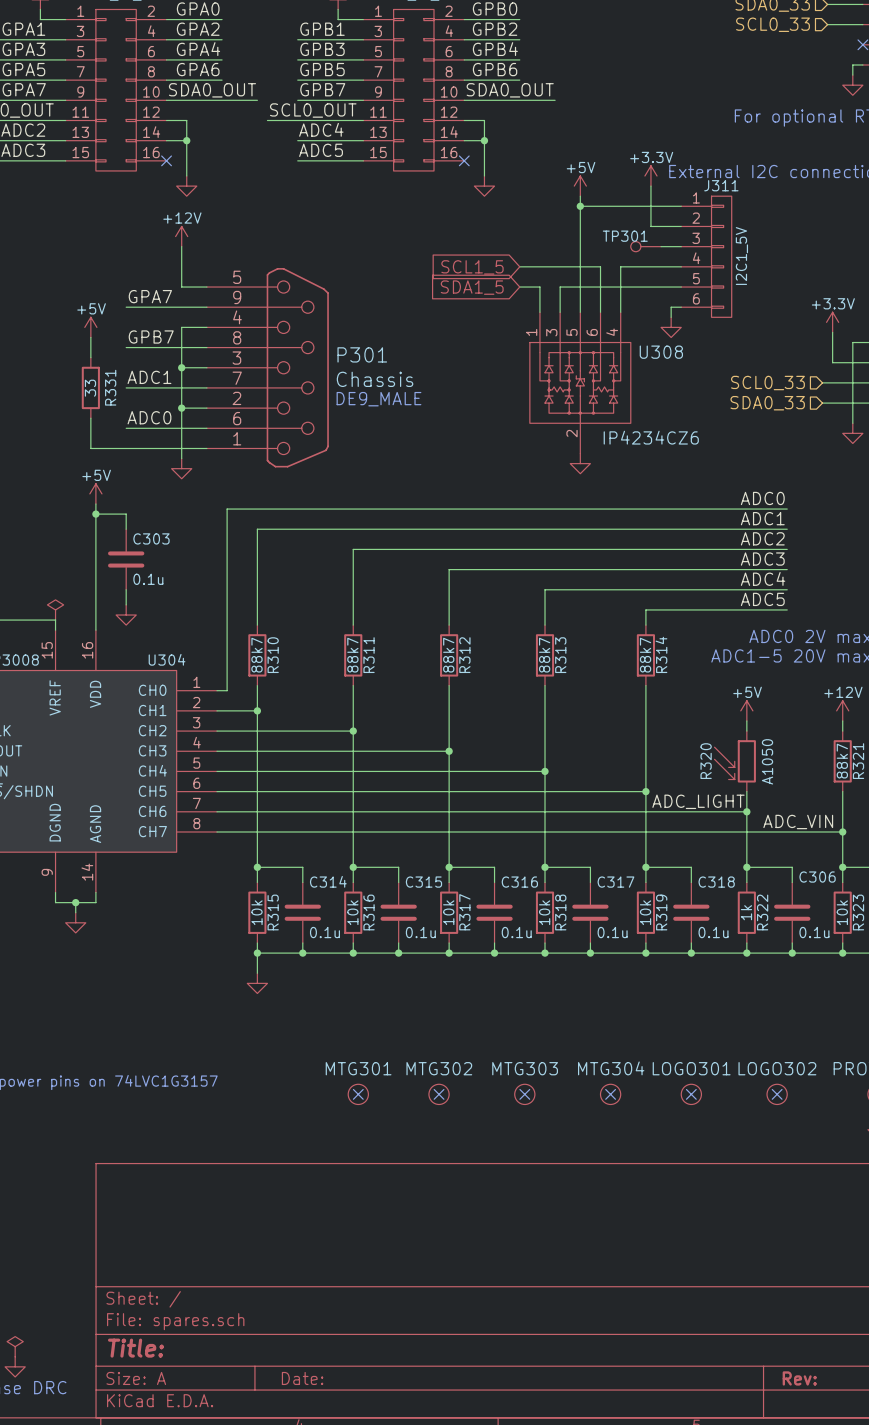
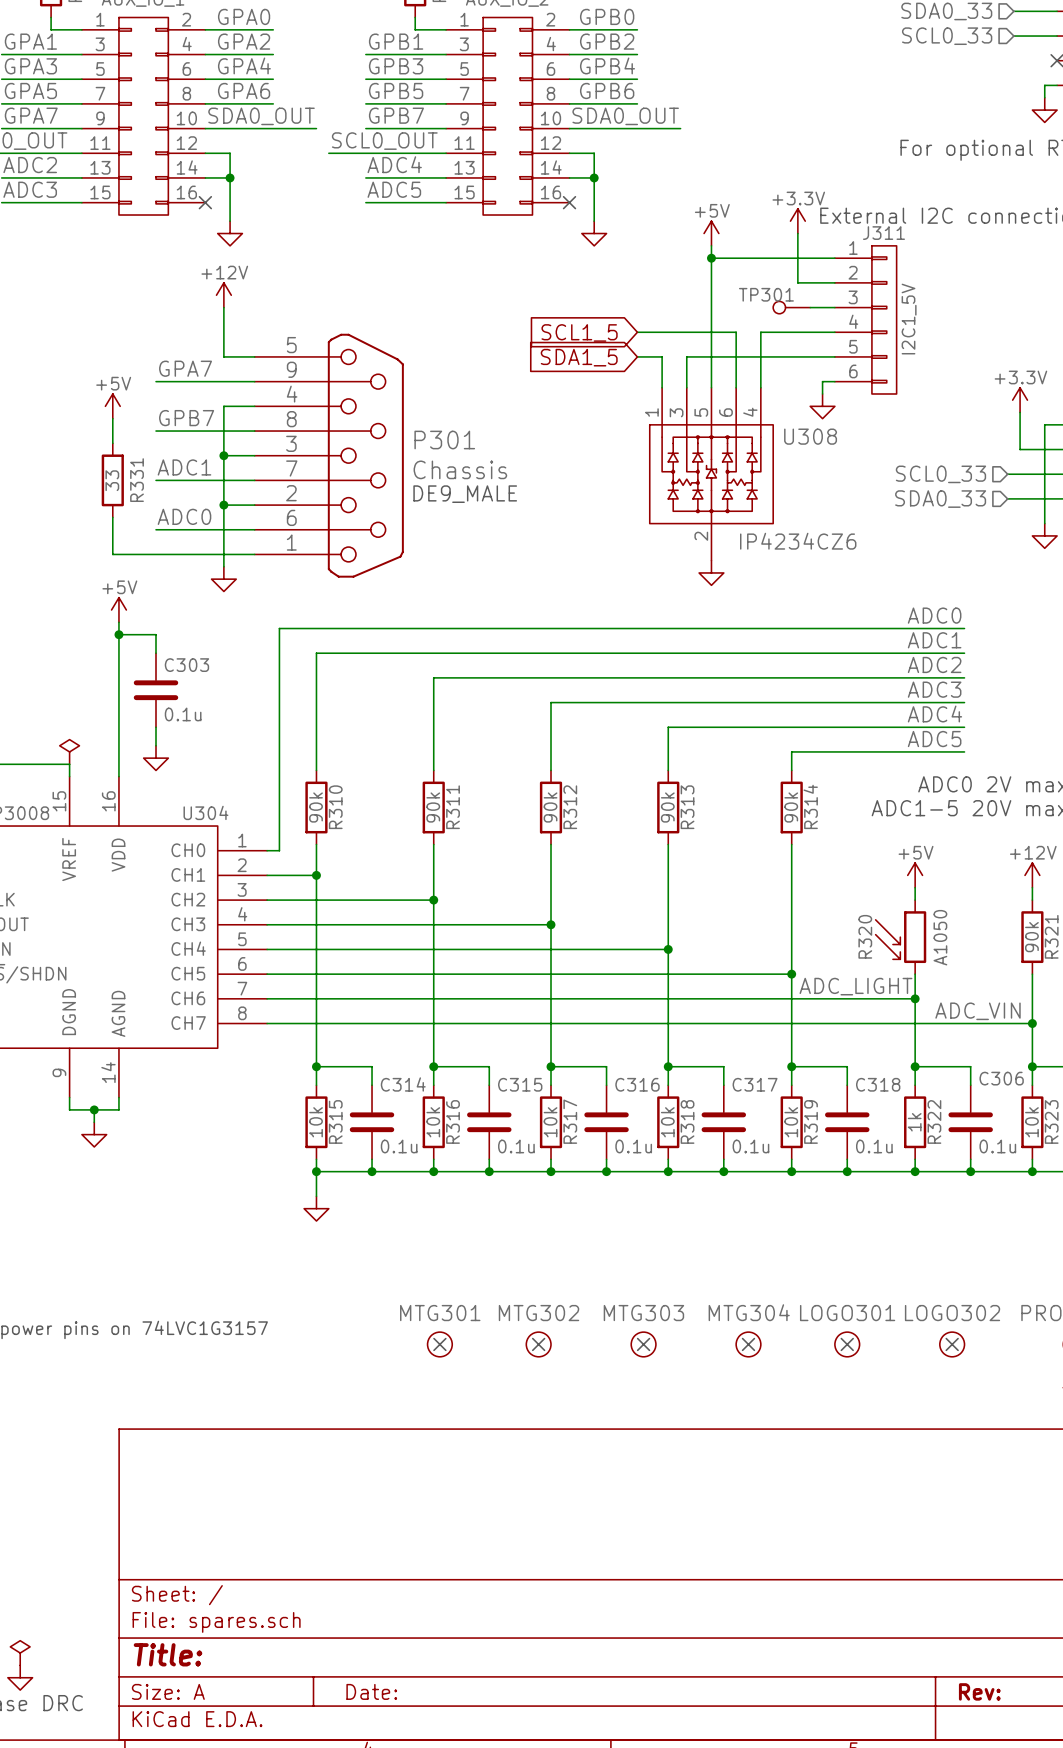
R310 value: 88k7 (257, 655) -> 90k (316, 807)
R311 value: 88k7 (352, 655) -> 90k (433, 807)
R312 value: 88k7 (448, 655) -> 90k (550, 807)
R313 value: 88k7 (544, 655) -> 90k (667, 807)
R314 value: 88k7 (645, 655) -> 90k (791, 807)
R321 value: 88k7 (842, 761) -> 90k (1031, 937)

